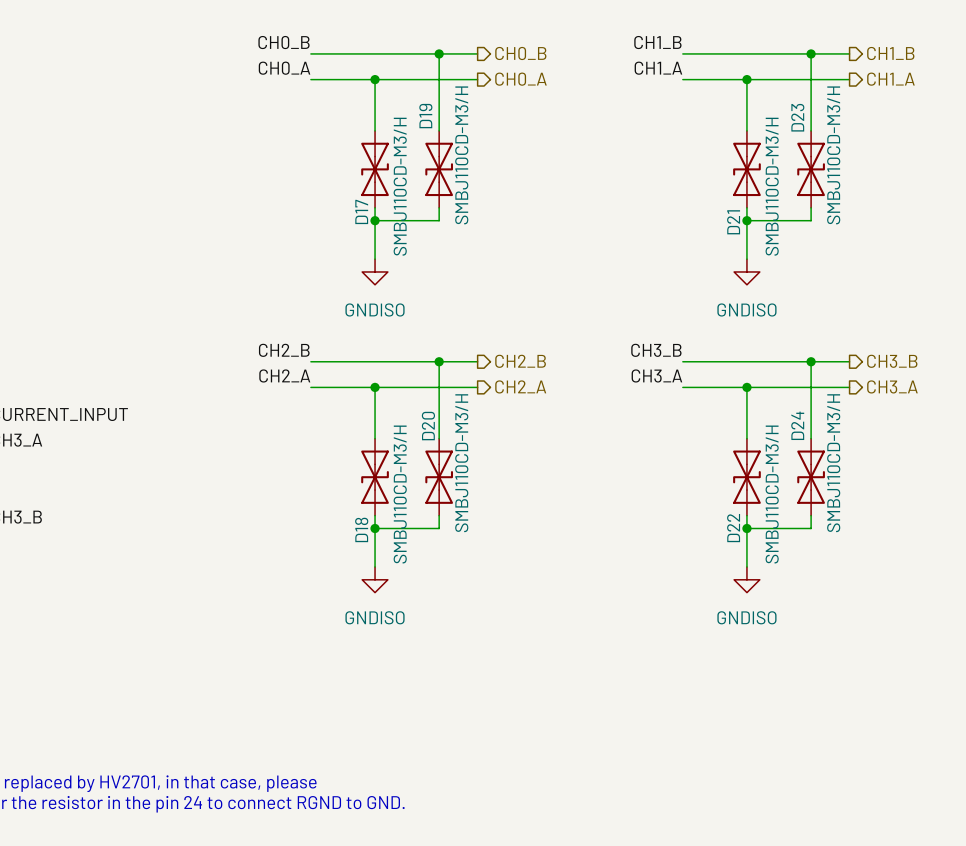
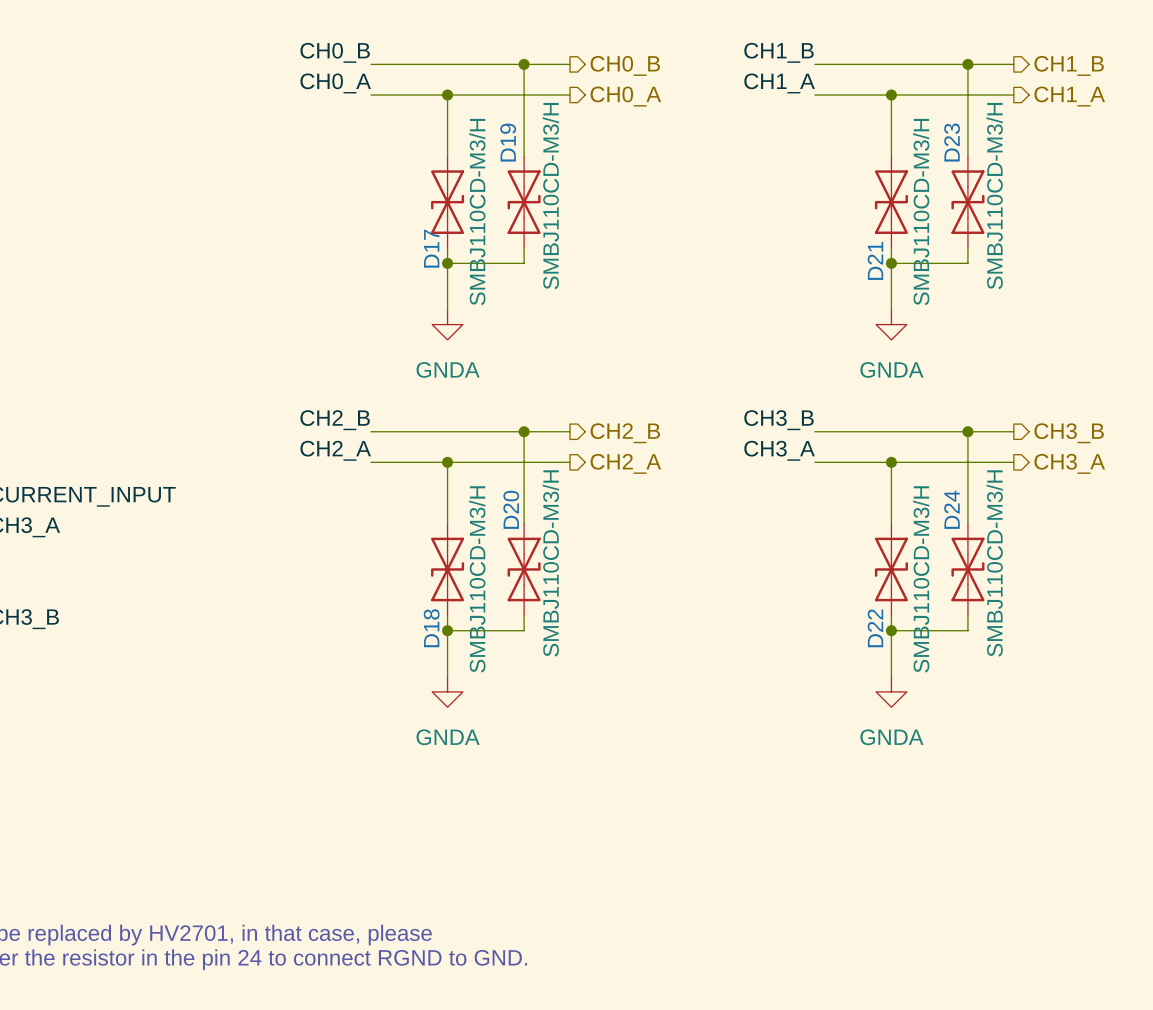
power symbol: GNDISO (375, 271) -> GNDA (447, 324)
power symbol: GNDISO (746, 271) -> GNDA (891, 324)
power symbol: GNDISO (375, 579) -> GNDA (447, 691)
power symbol: GNDISO (746, 579) -> GNDA (891, 691)

